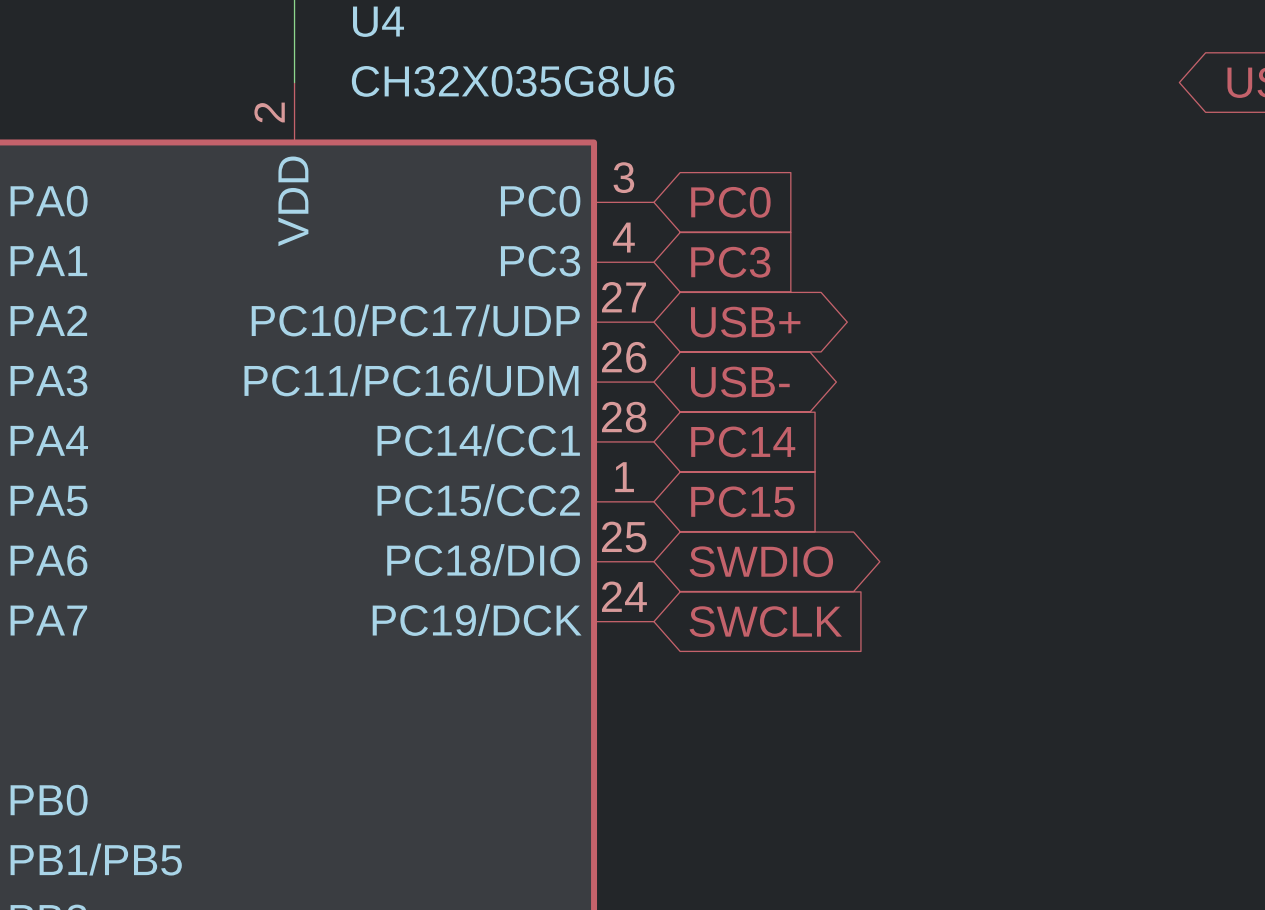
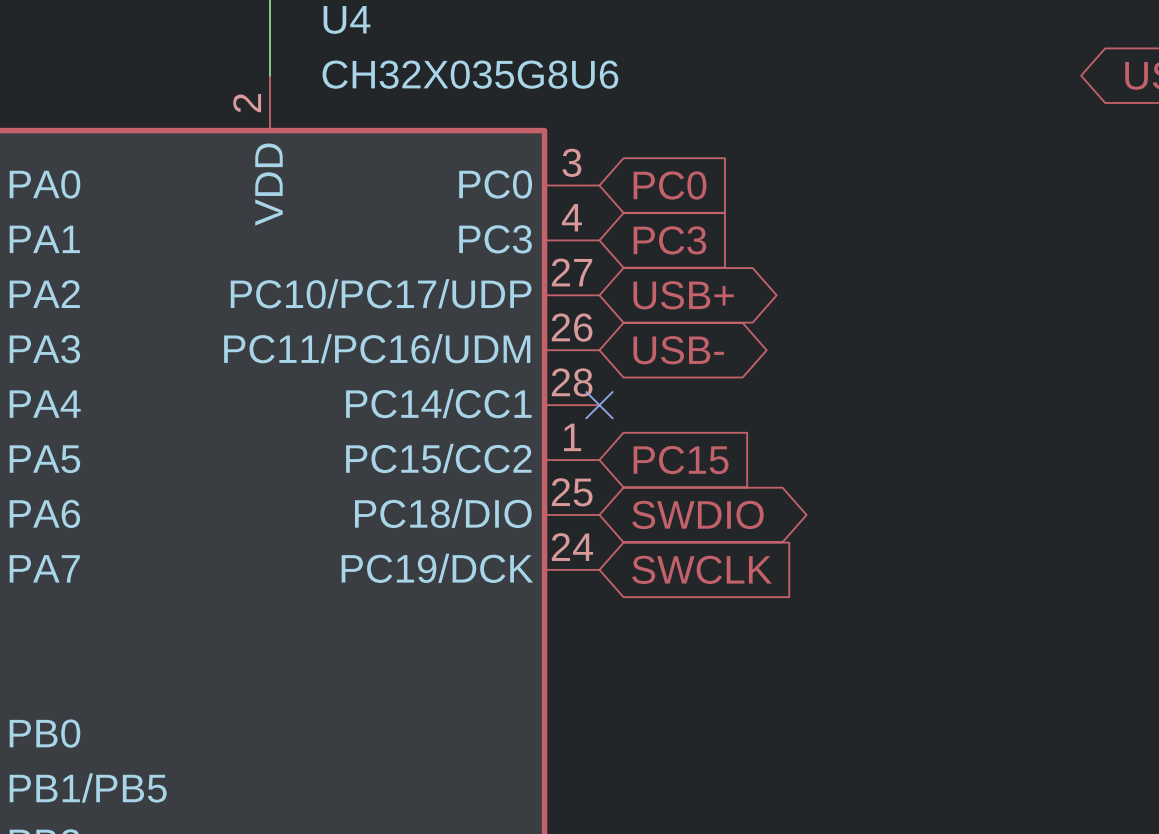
no-connect mark: none -> (599, 405)
global label: PC14 (743, 441) -> none

